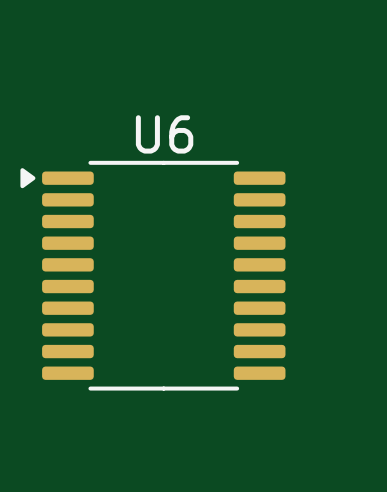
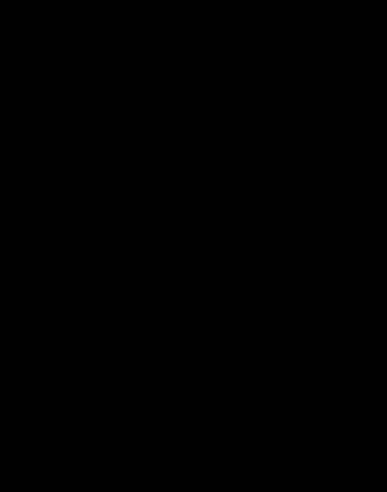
U6: (152, 275) -> none

